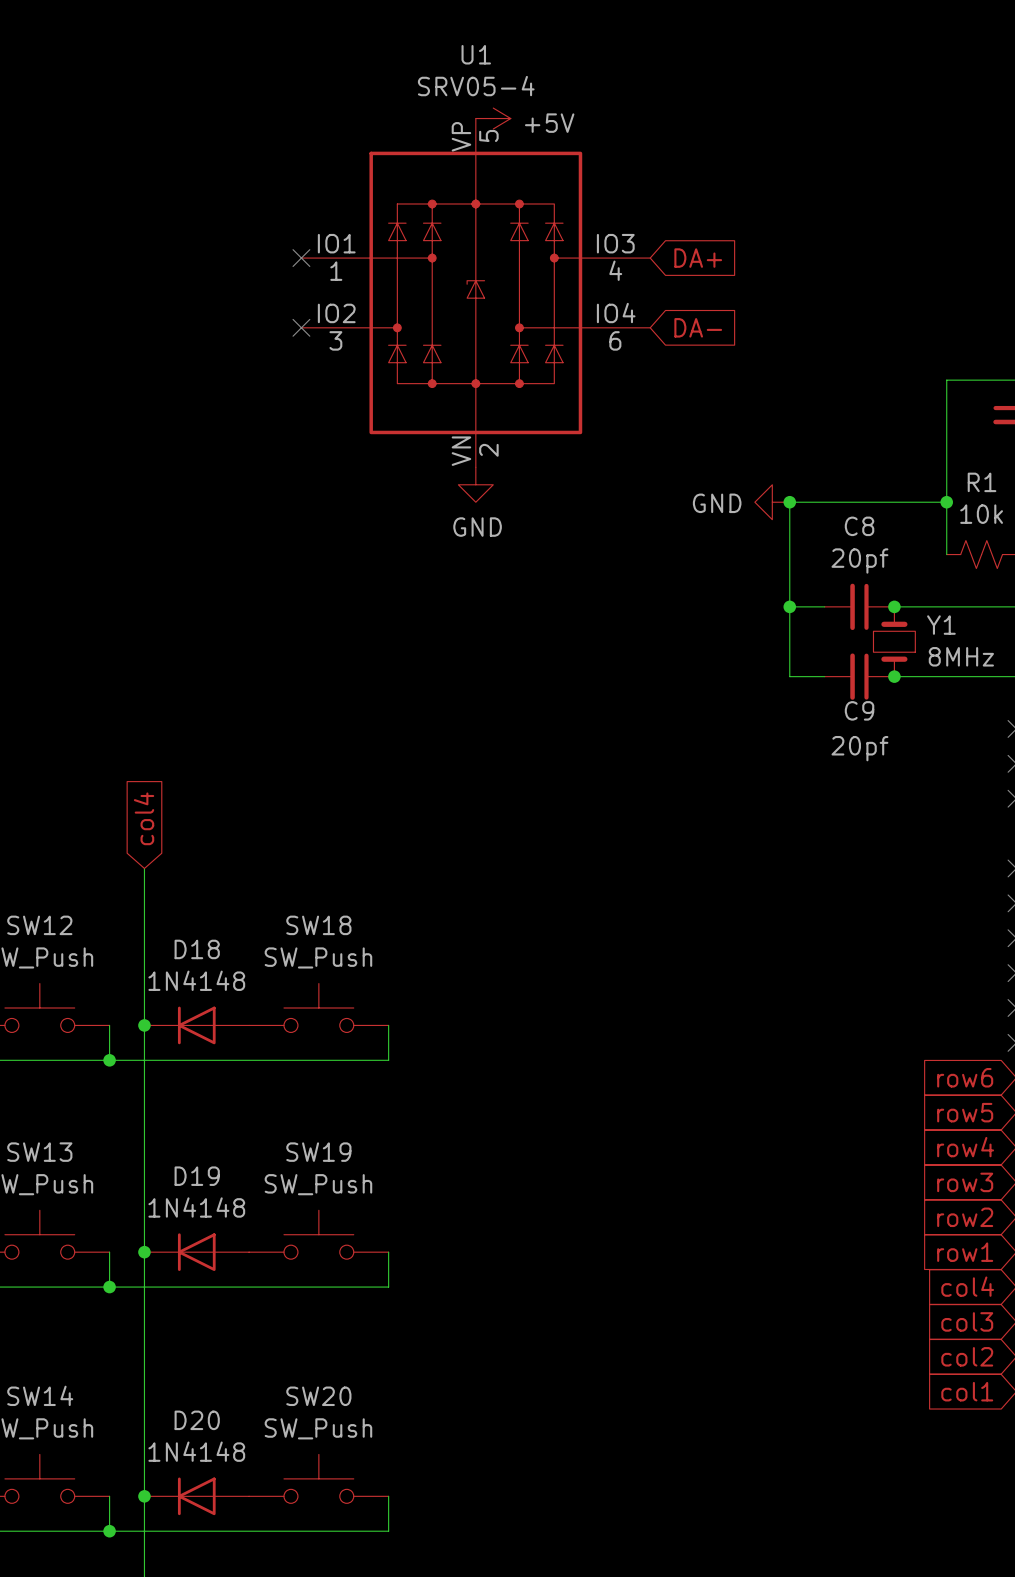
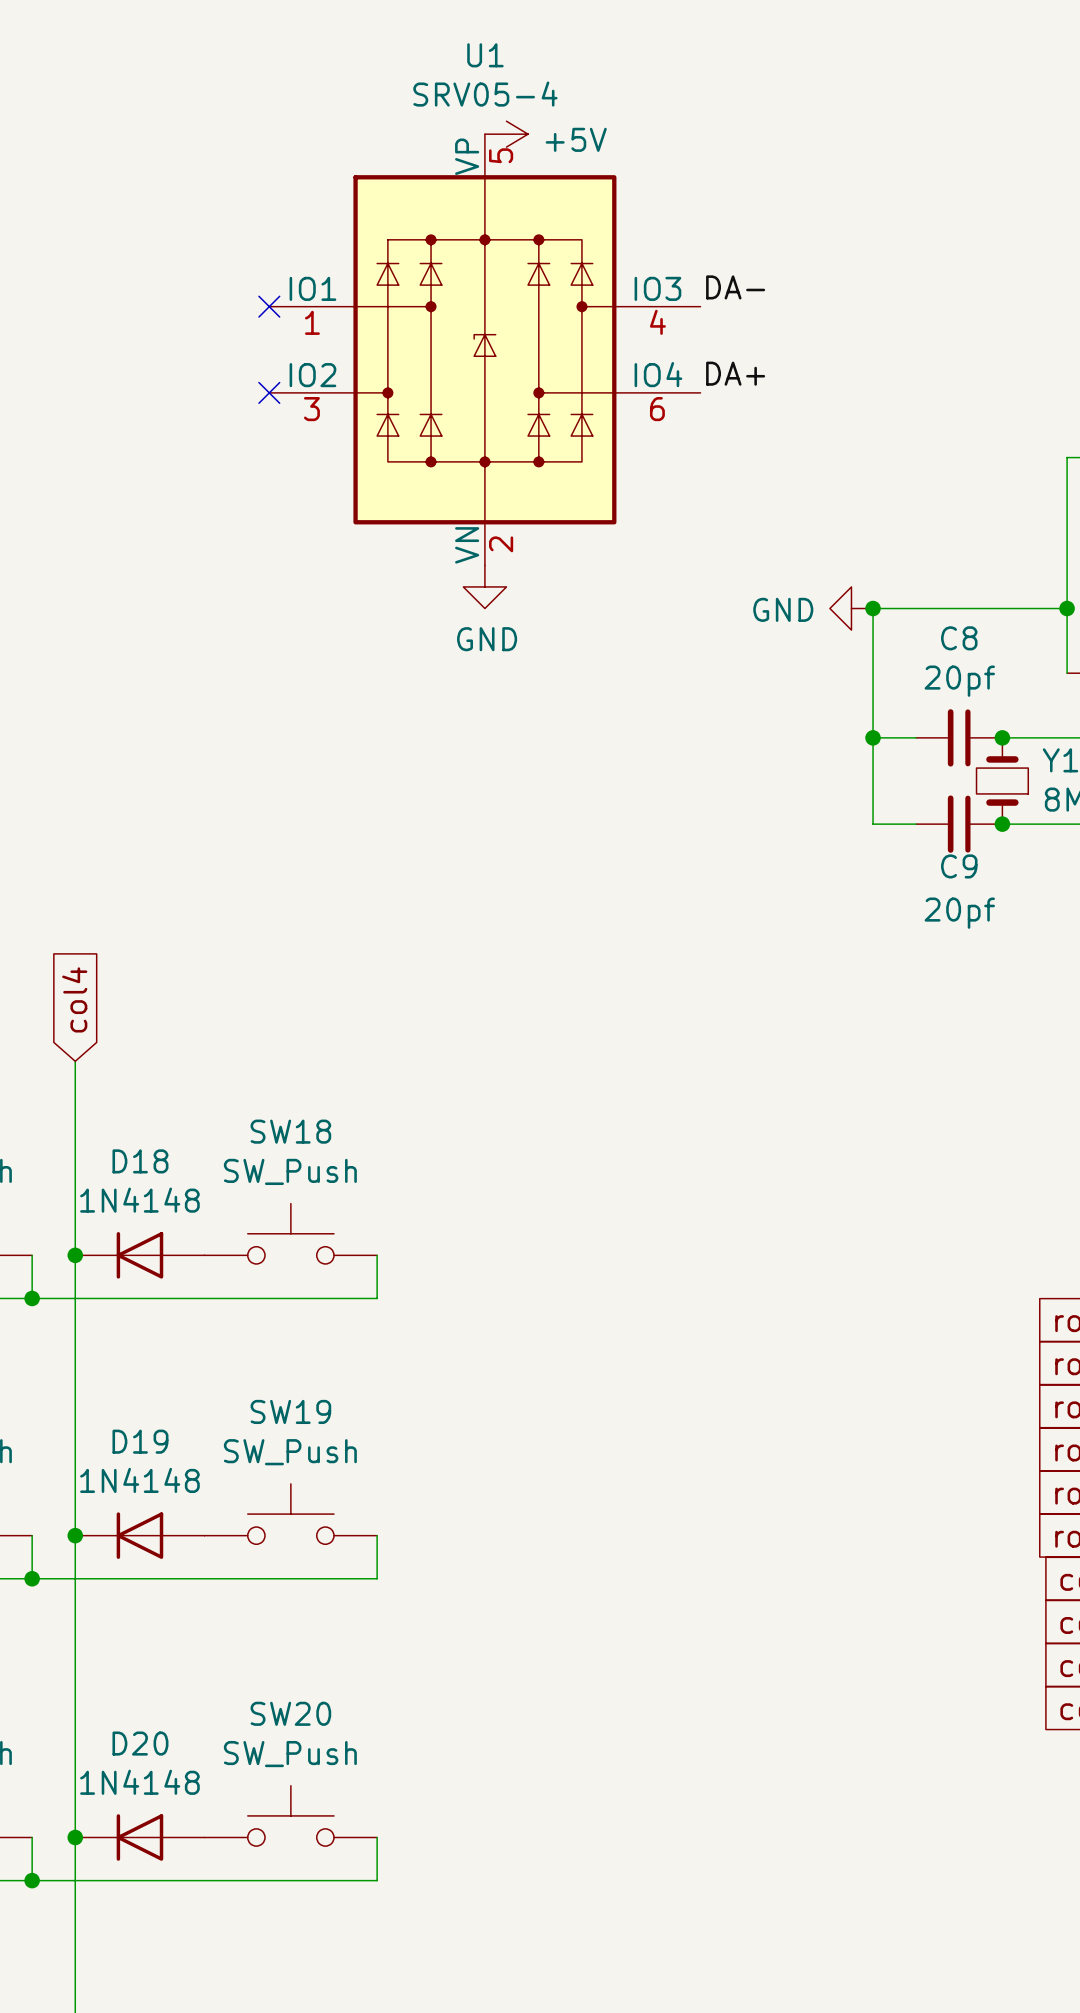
label: none -> DA- (735, 287)
global label: DA+ (698, 258) -> none
label: none -> DA+ (735, 373)
global label: DA- (698, 327) -> none

